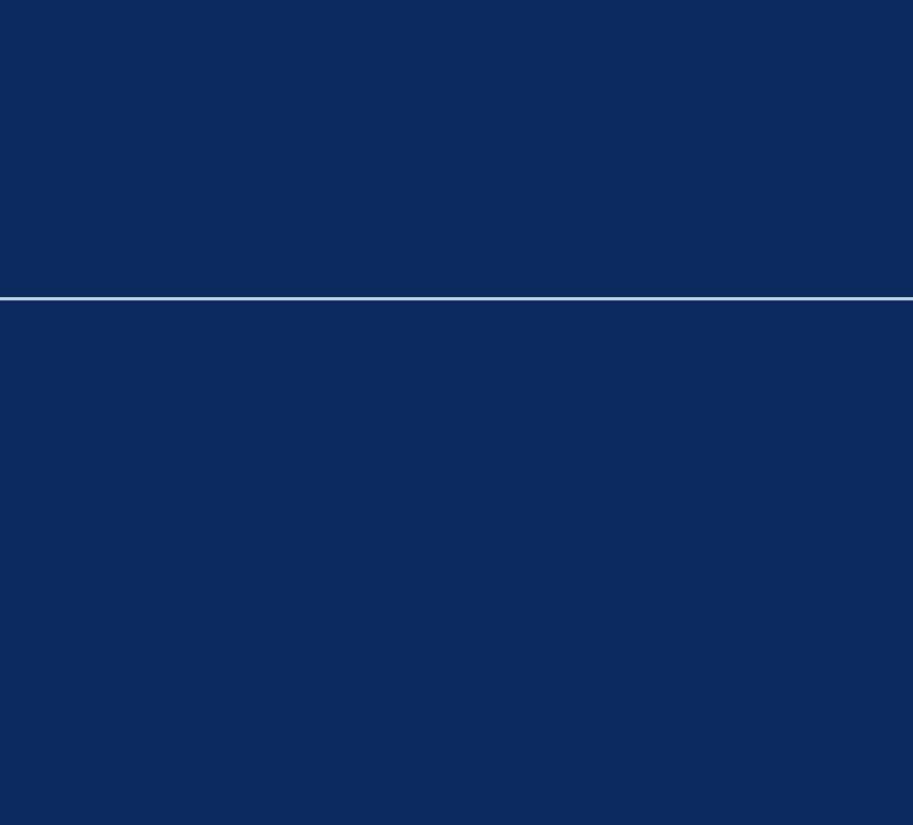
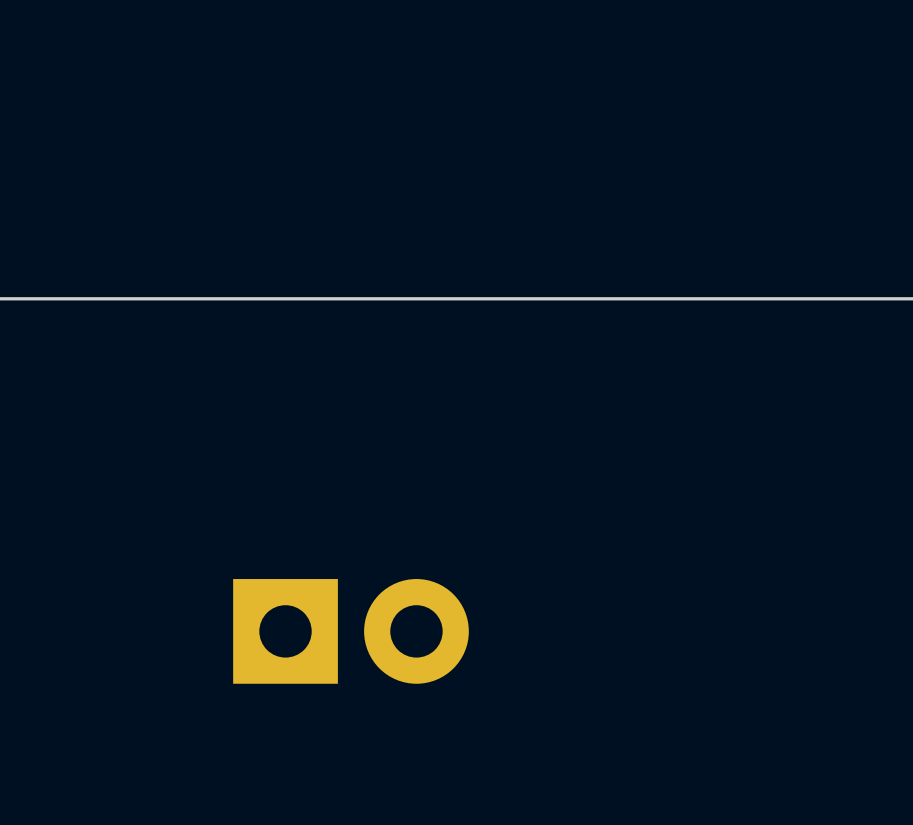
part: none -> (350, 631)

